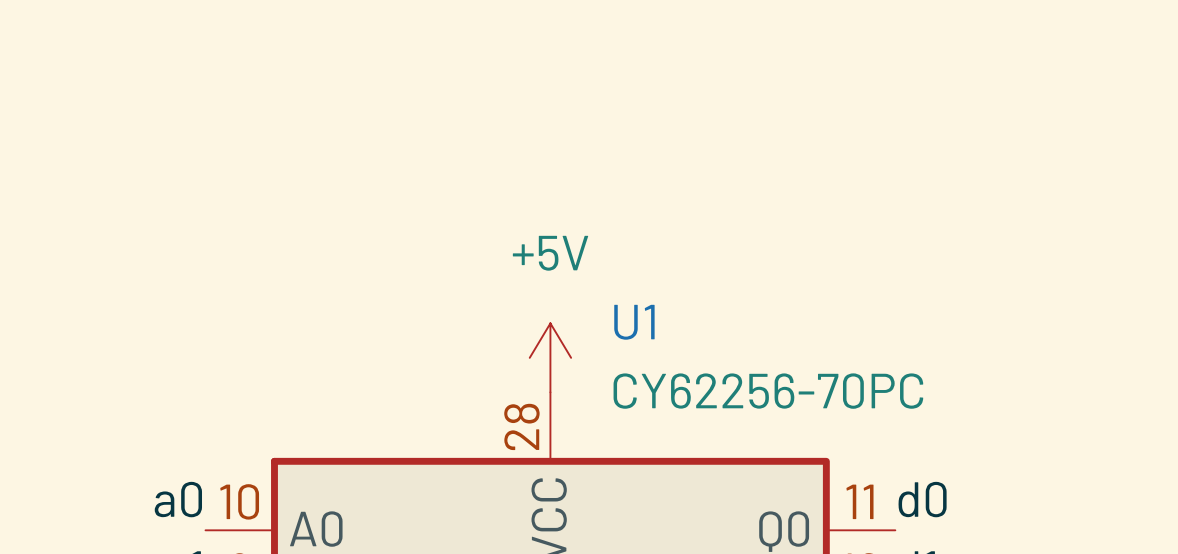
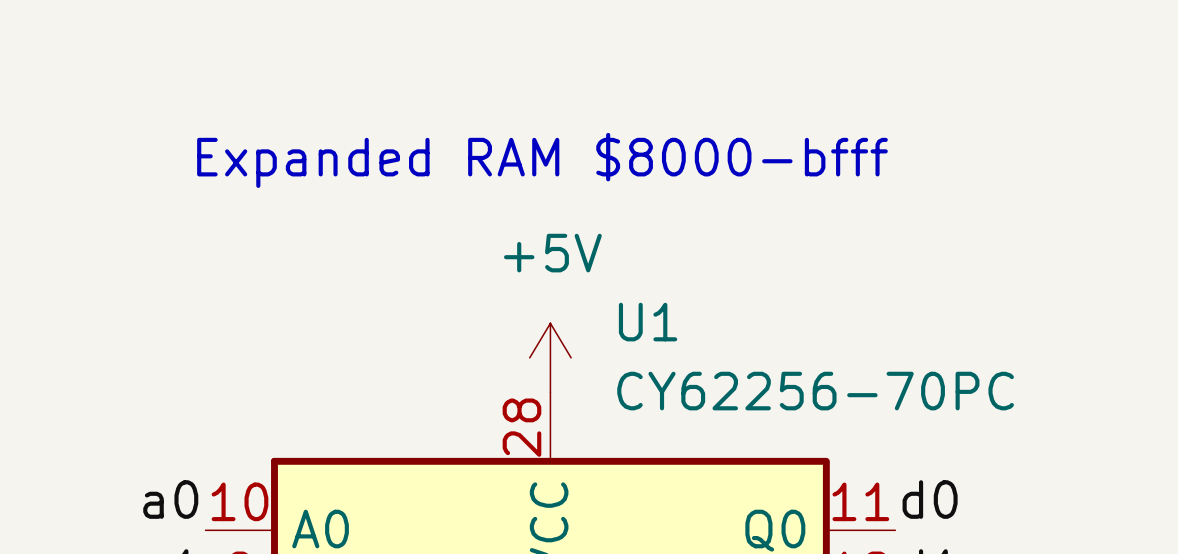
text: none -> Expanded RAM $8000-bfff (542, 160)

